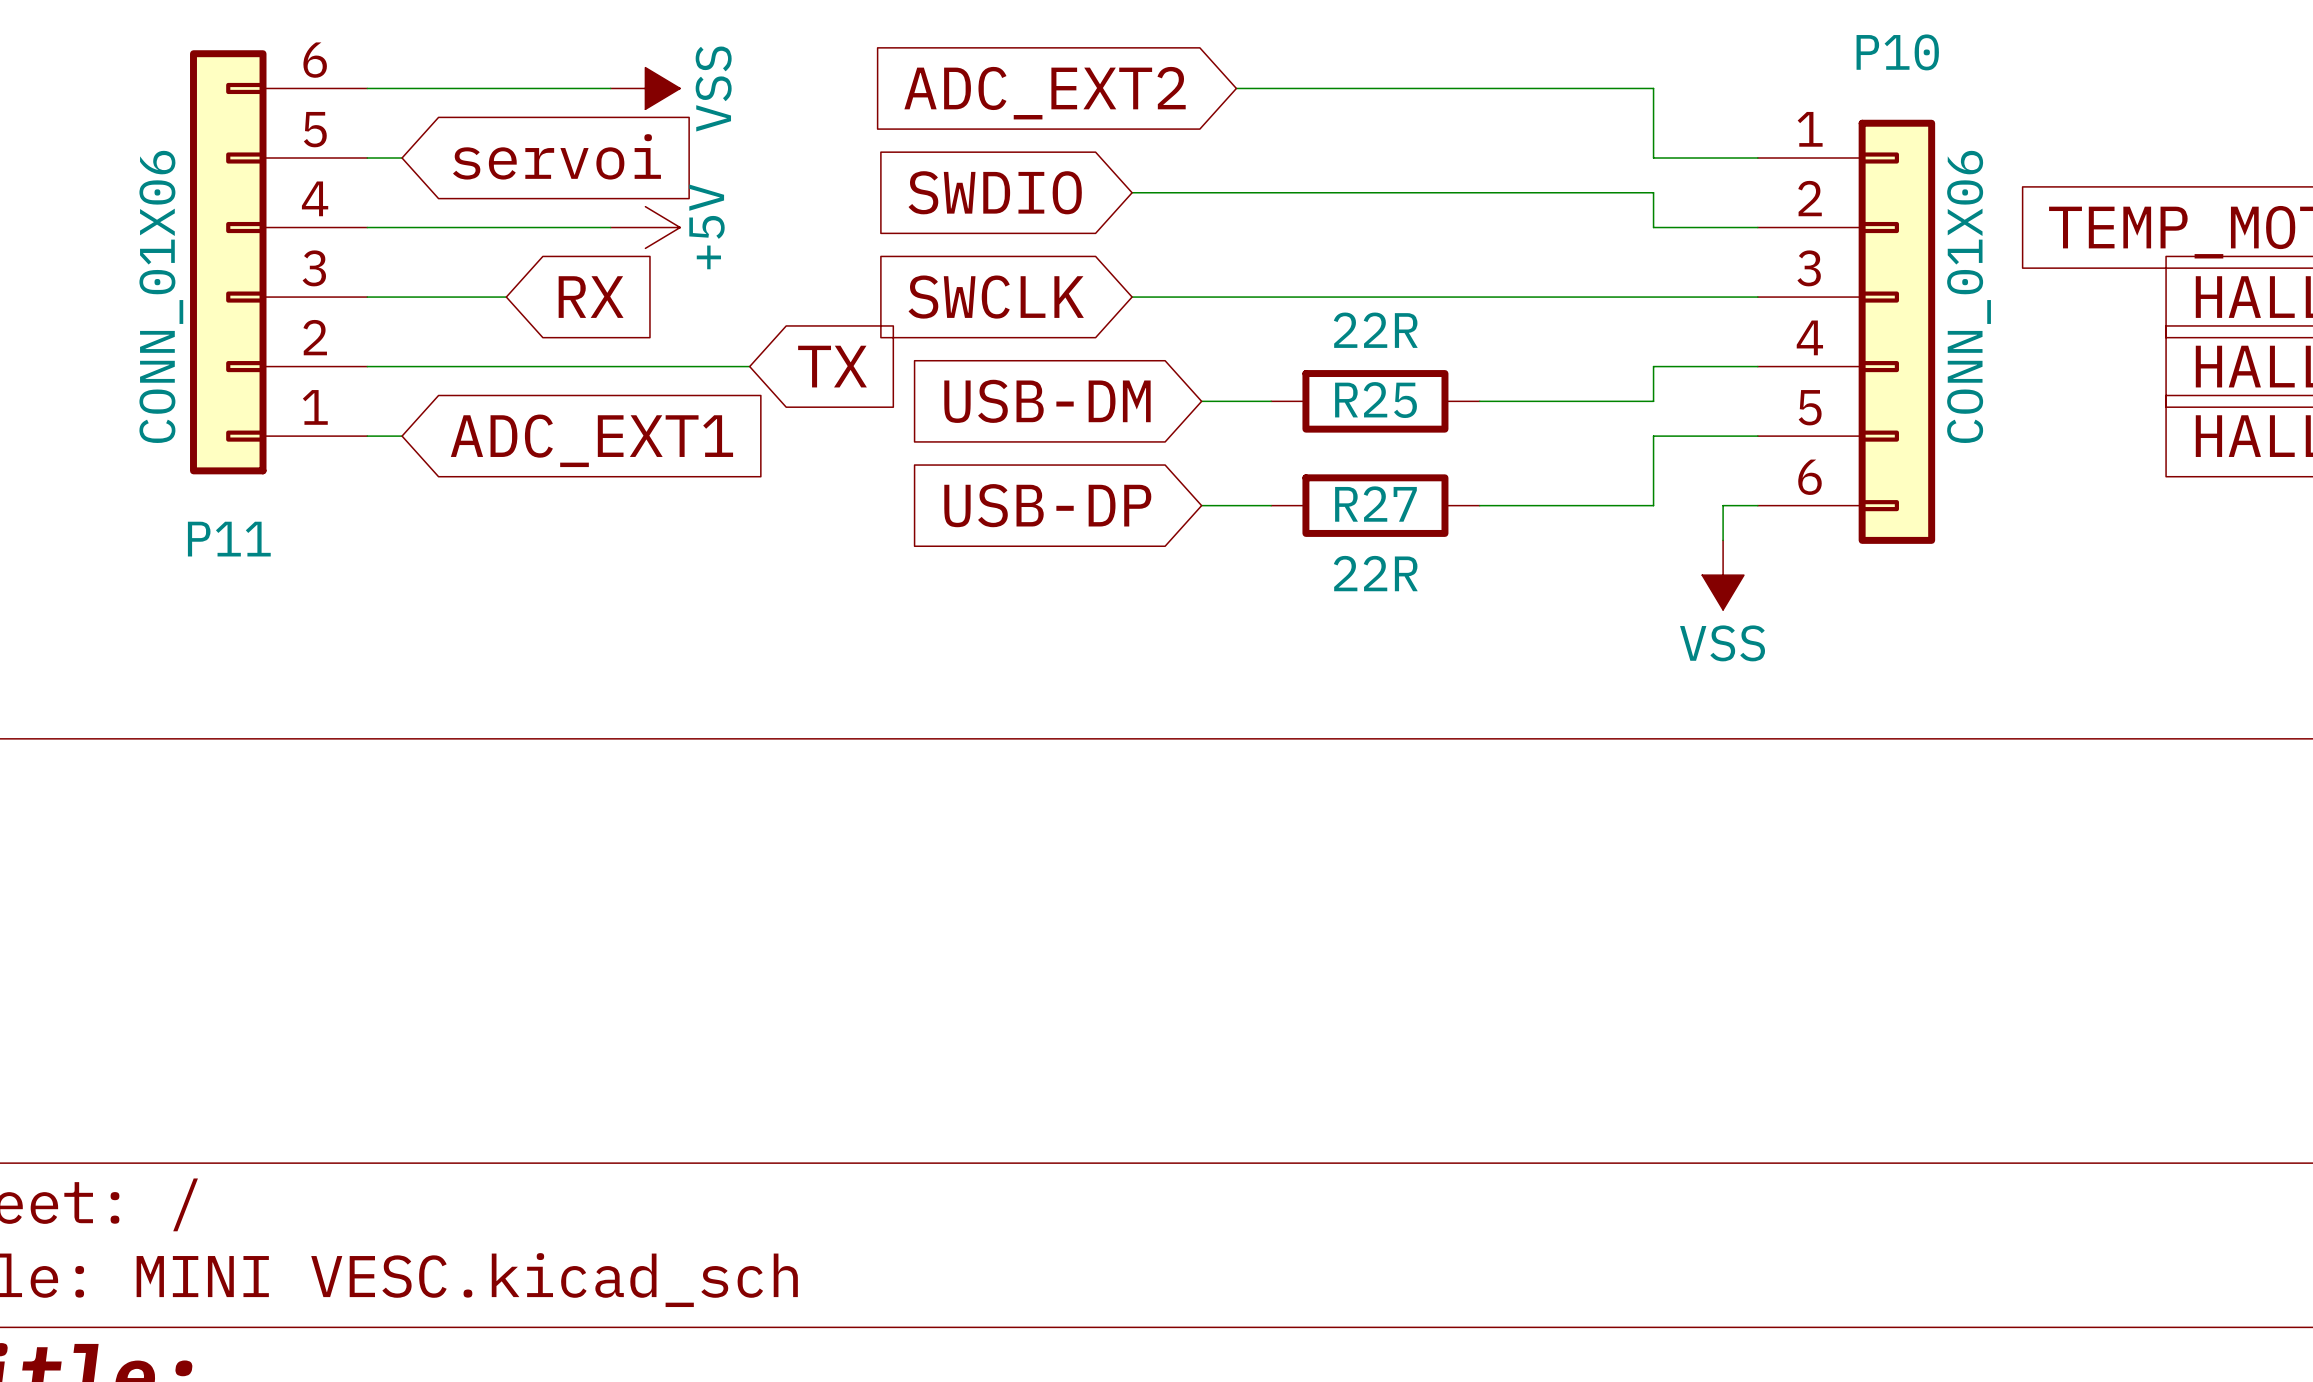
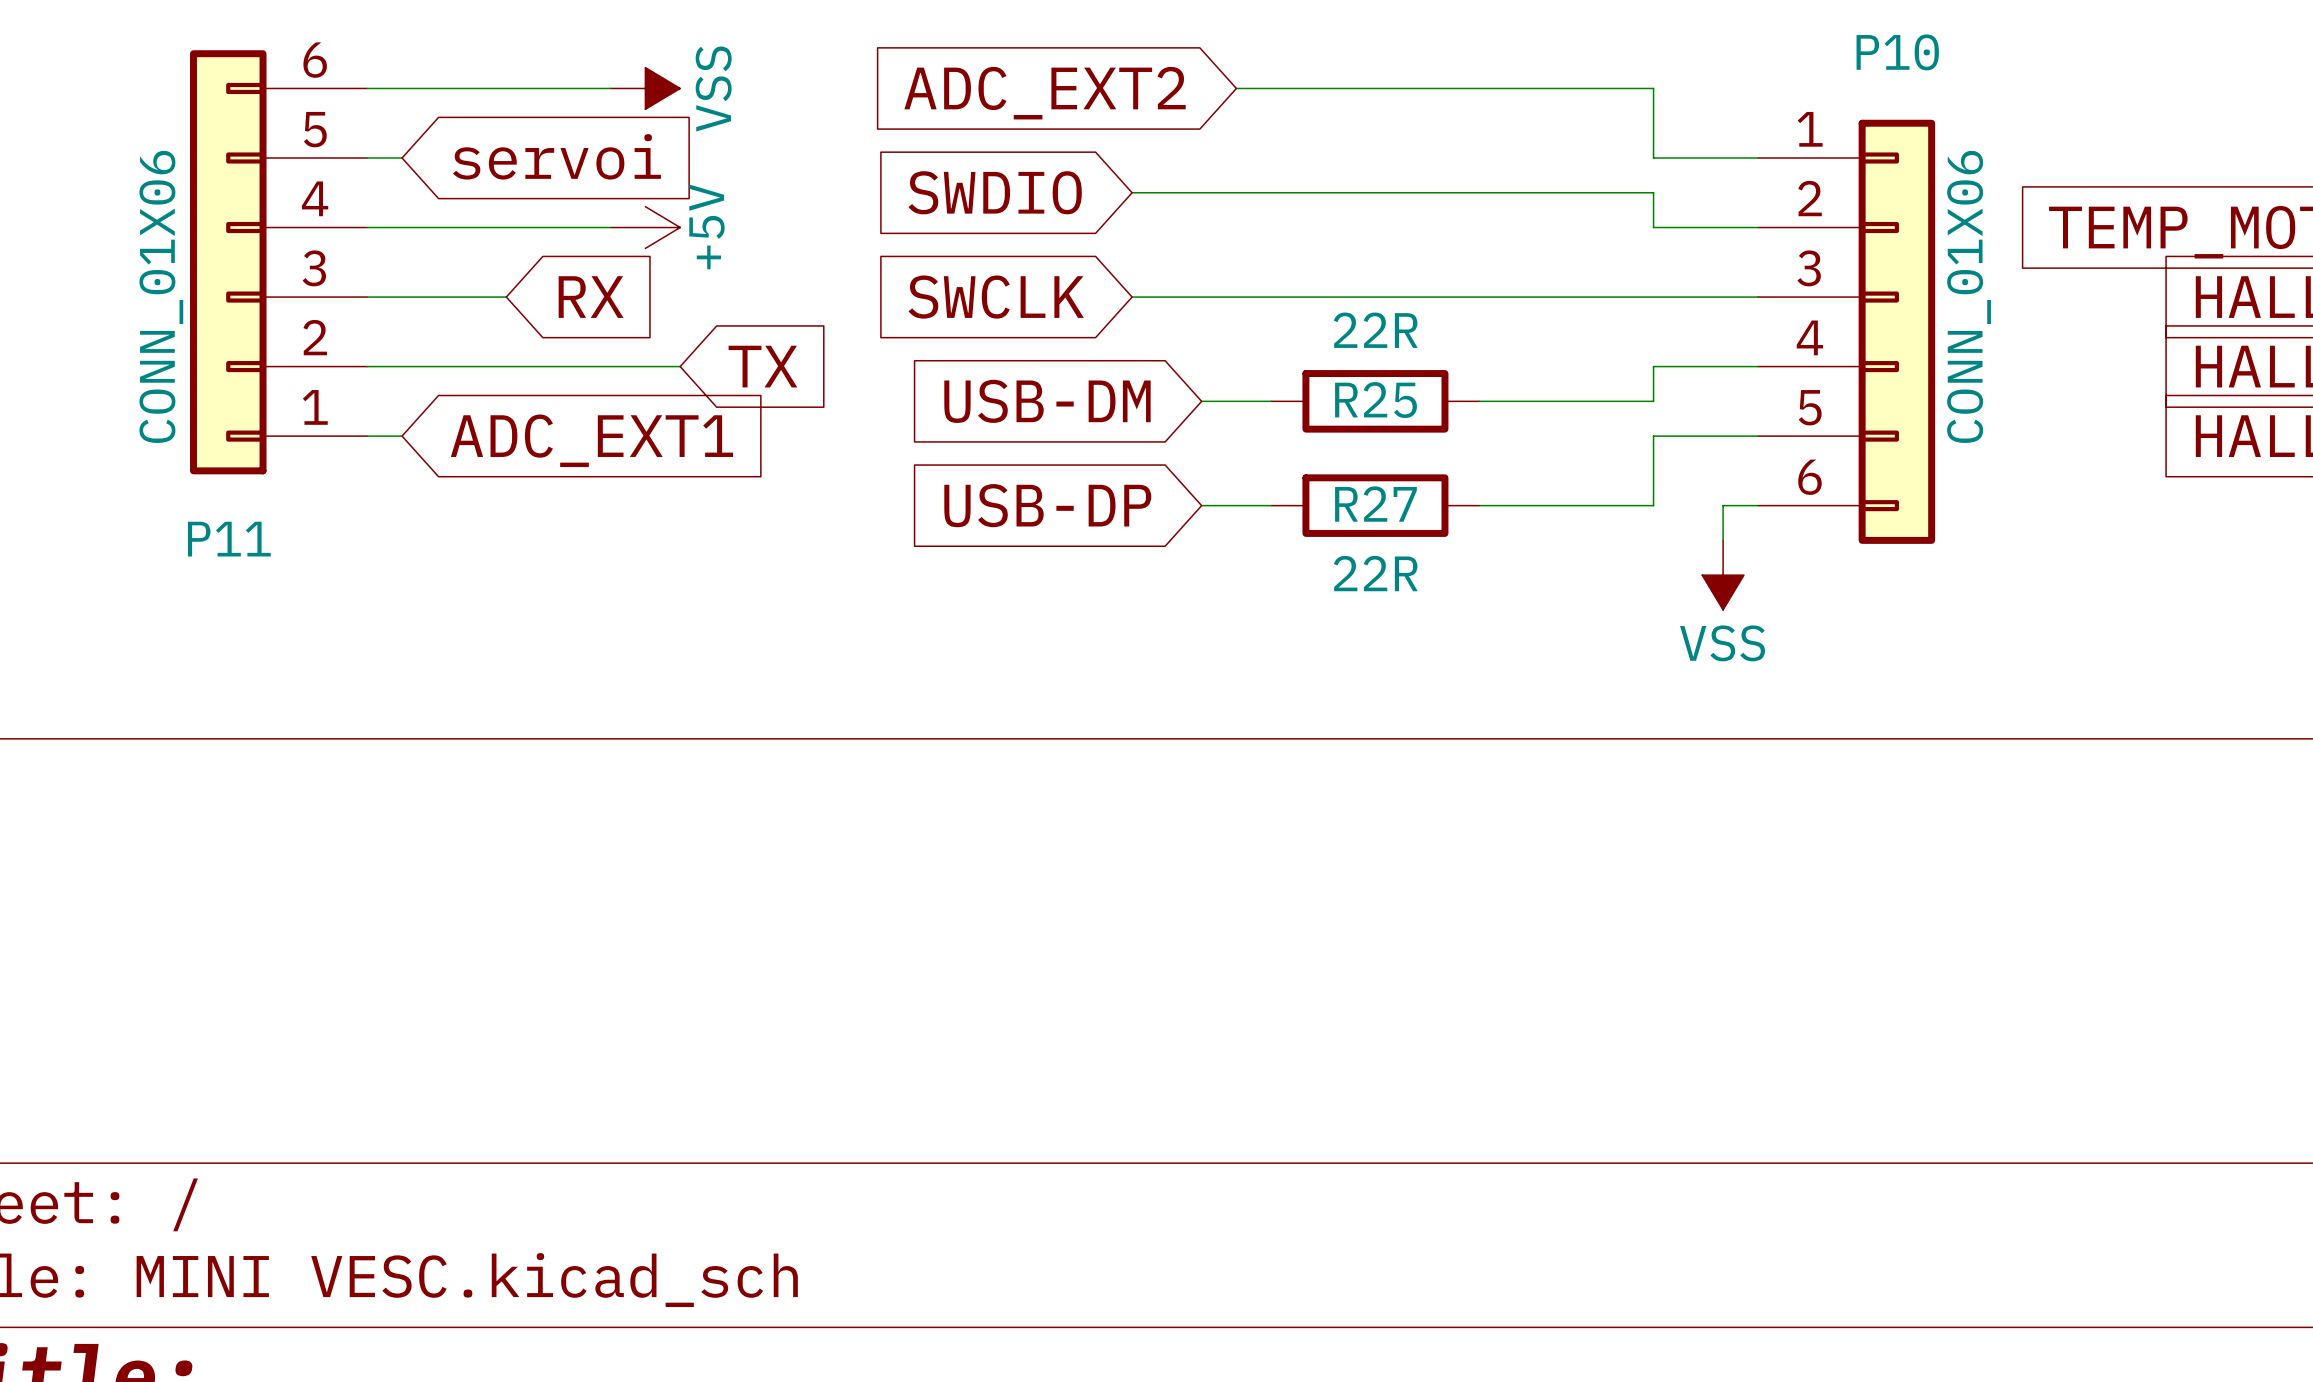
wire: (680, 366) (749, 366) -> none
global label position: TX (832, 366) -> TX (762, 366)

